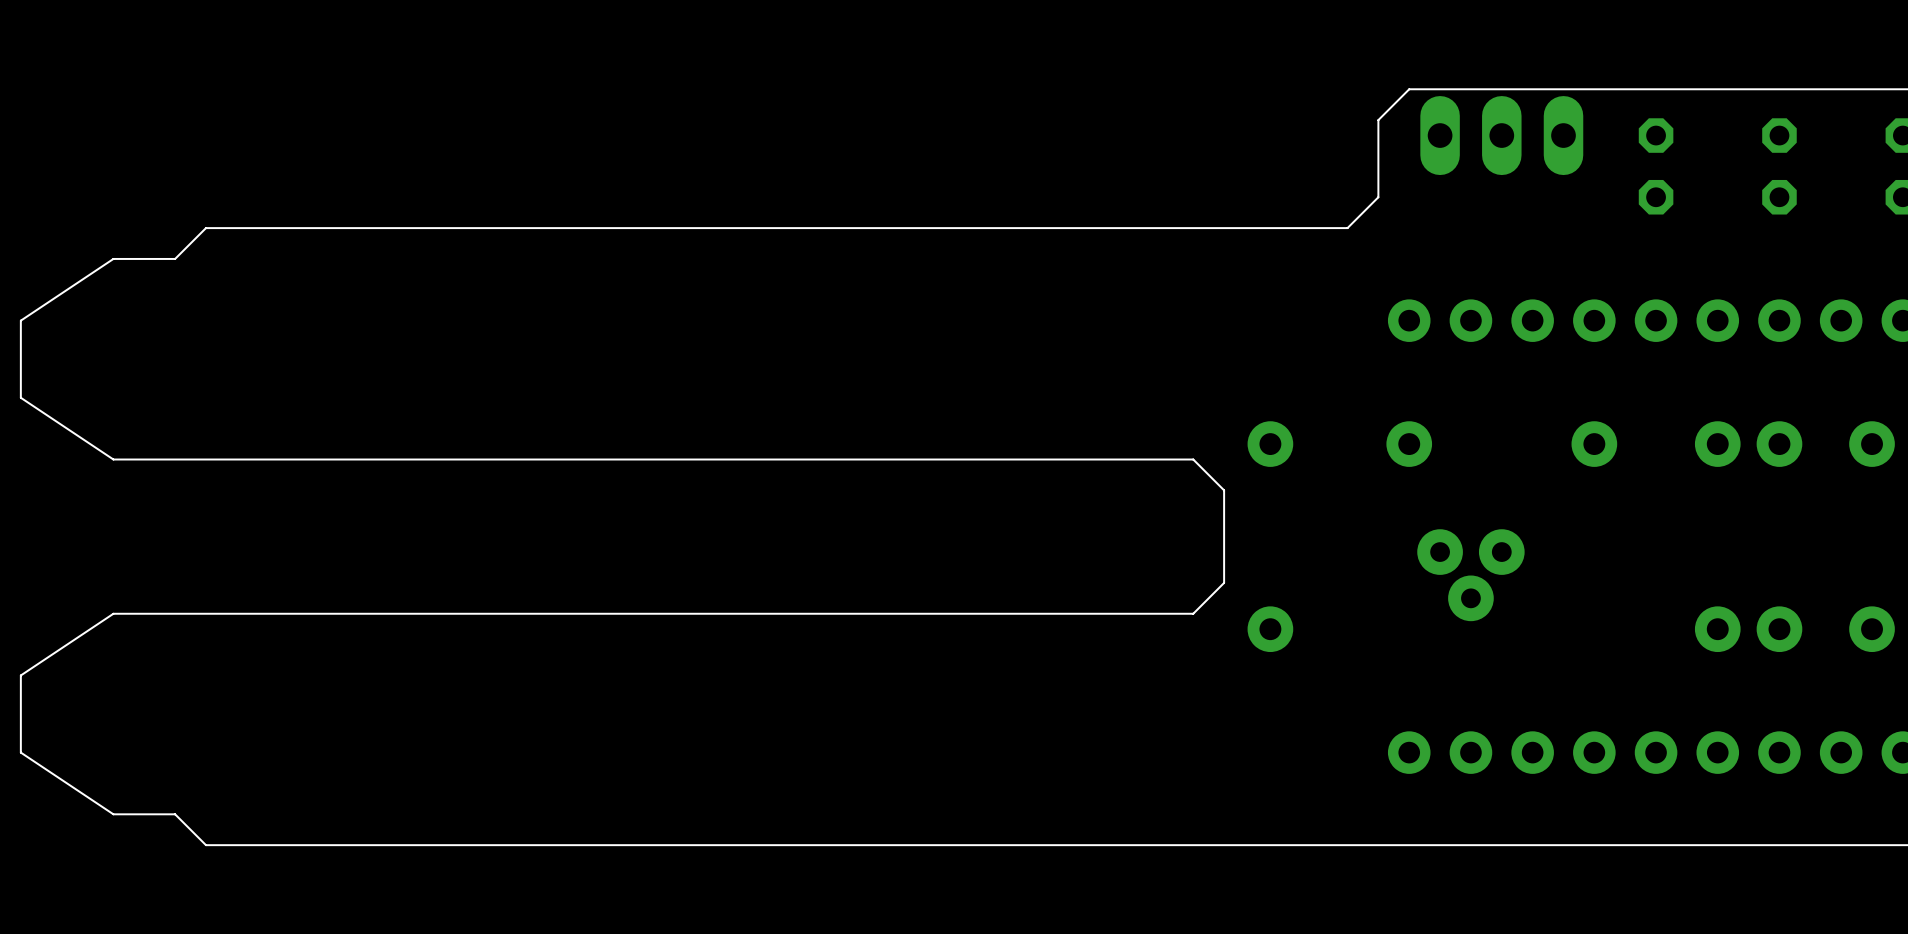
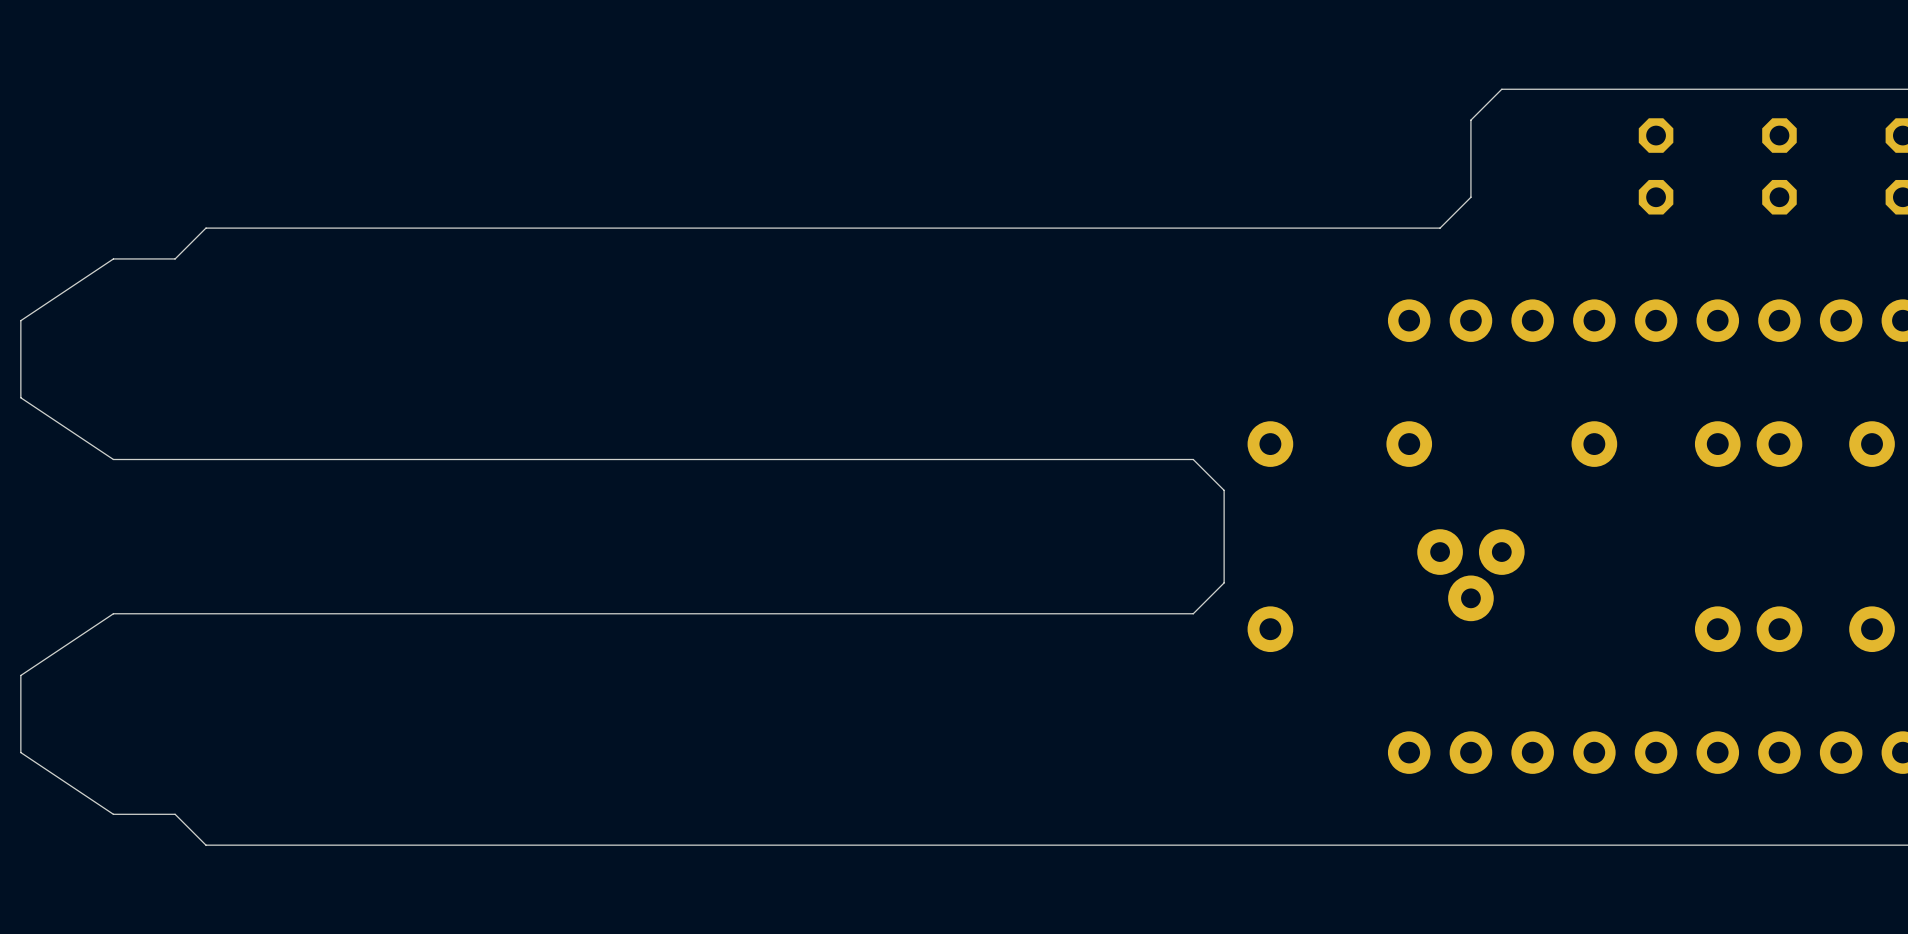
board edge: (1501, 89) (1409, 89) (1378, 120) (1378, 197) (1347, 228) -> (1501, 89) (1470, 120) (1470, 197) (1440, 228) (1347, 228)
part: (1501, 135) -> none

